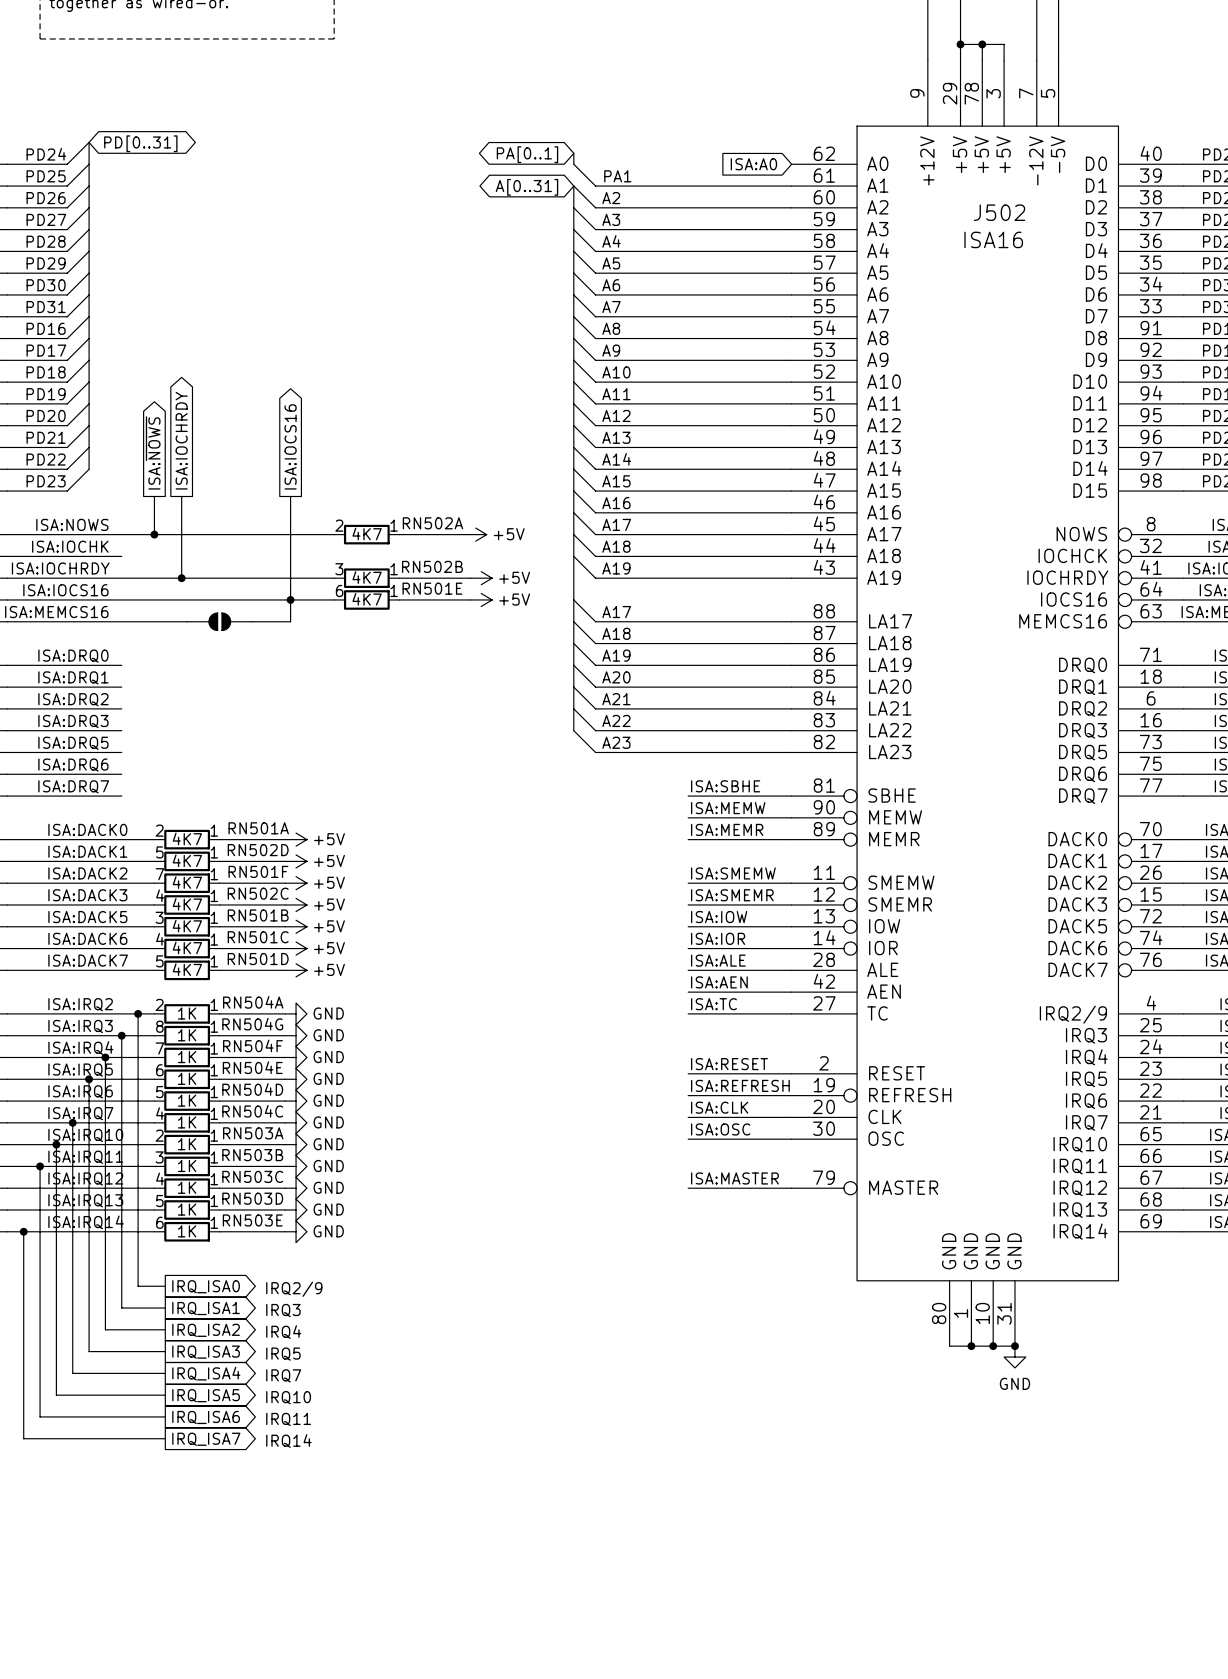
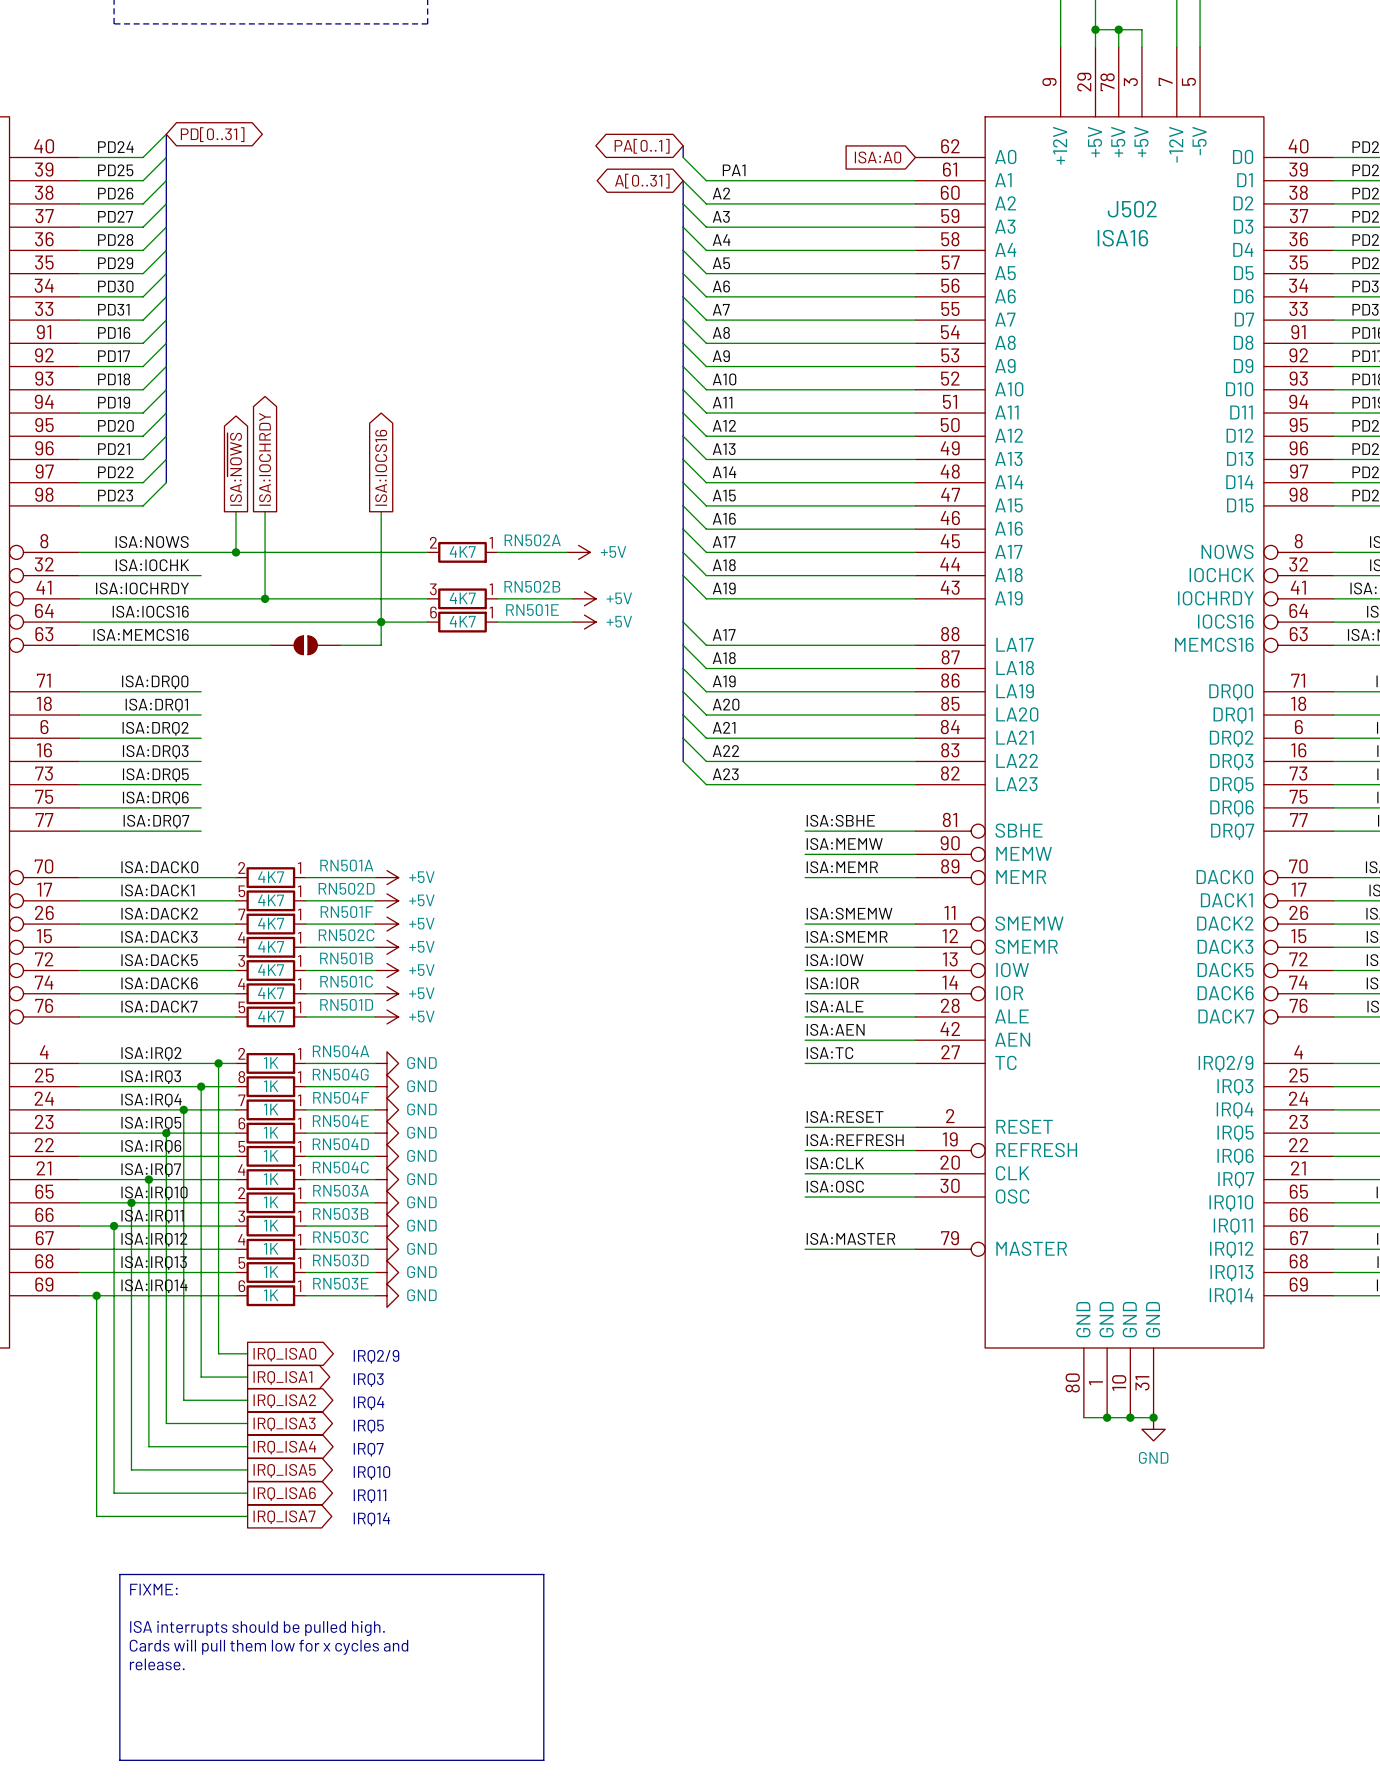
line: none -> (119, 1574) (543, 1574) (543, 1760) (119, 1760) (119, 1574)
text: none -> FIXME: (153, 1589)
text: none -> ISA interrupts should be pulled high. (257, 1628)
text: none -> Cards will pull them low for x cycles and (268, 1647)
text: none -> release. (157, 1664)

